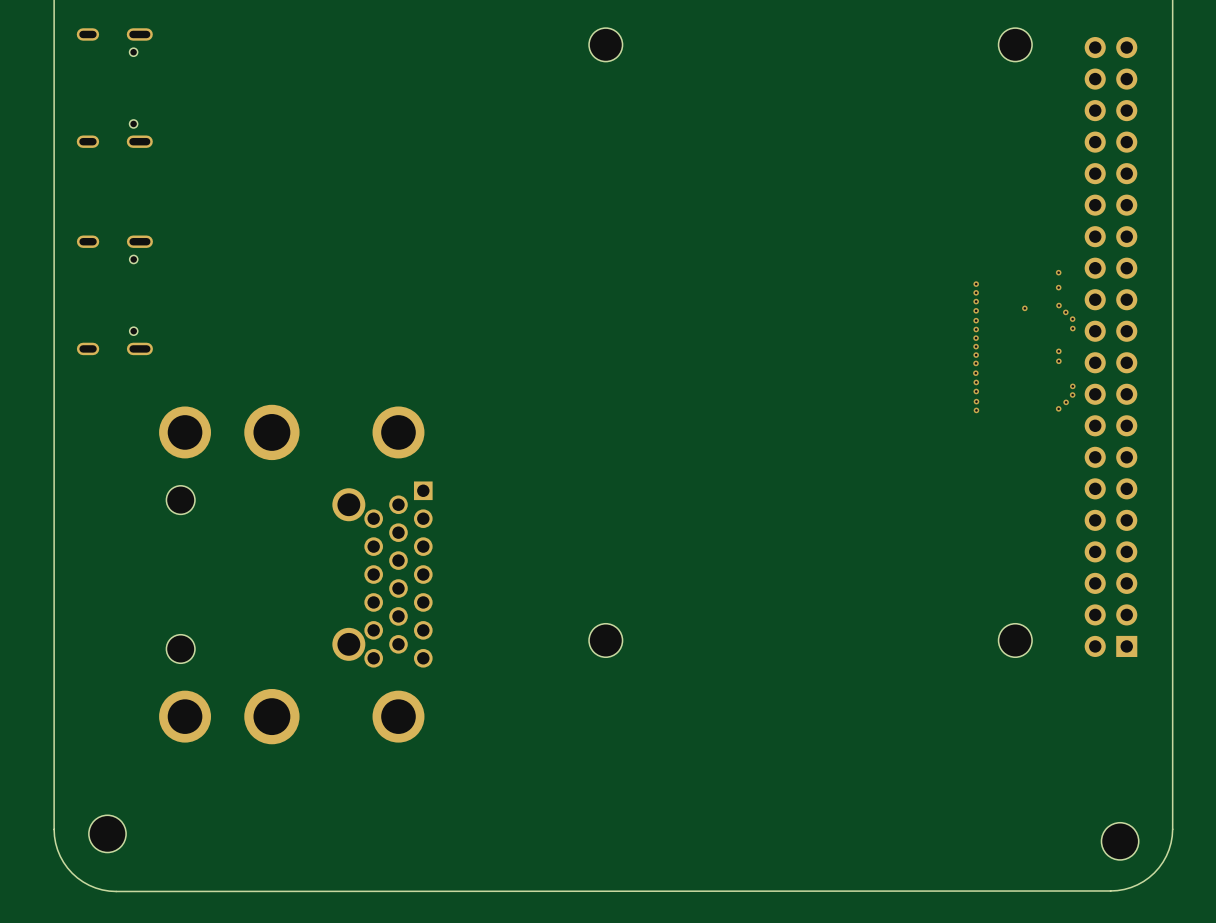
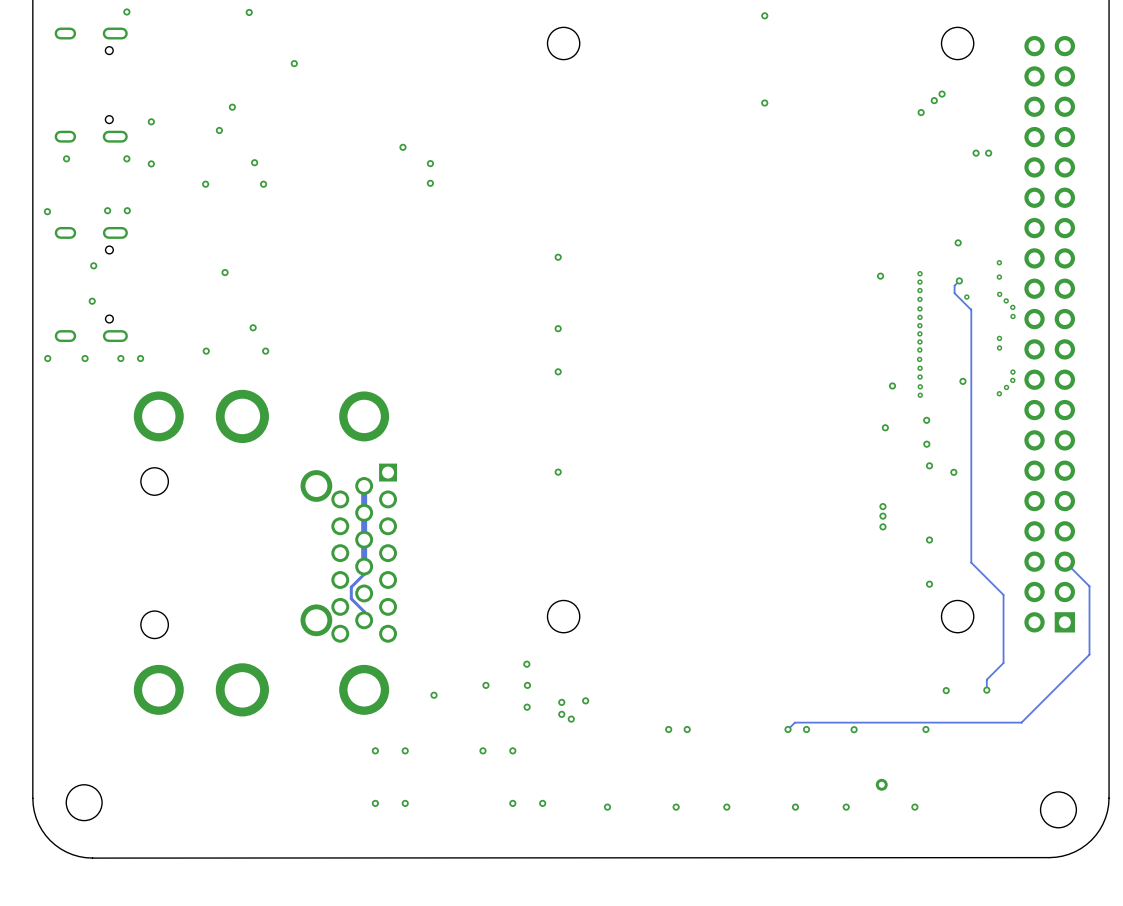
via: none -> (126, 11)
via: none -> (249, 12)
via: none -> (764, 15)
via: none -> (294, 63)
via: none -> (942, 94)
via: none -> (934, 100)
via: none -> (764, 103)
via: none -> (232, 107)
via: none -> (921, 112)
via: none -> (151, 121)
via: none -> (219, 130)
via: none -> (402, 147)
via: none -> (976, 153)
via: none -> (988, 153)
via: none -> (66, 158)
via: none -> (126, 158)
via: none -> (254, 162)
via: none -> (151, 163)
via: none -> (430, 163)
via: none -> (430, 183)
via: none -> (205, 184)
via: none -> (263, 184)
via: none -> (107, 210)
via: none -> (127, 210)
via: none -> (47, 211)
via: none -> (958, 242)
via: none -> (558, 257)
via: none -> (93, 265)
via: none -> (225, 272)
via: none -> (880, 276)
track: none -> (959, 280) (954, 285) (954, 293) (971, 309) (971, 562) (1003, 594) (1003, 662) (986, 679) (986, 690)
via: none -> (959, 280)
via: none -> (92, 301)
via: none -> (253, 327)
via: none -> (558, 328)
via: none -> (206, 351)
via: none -> (265, 351)
via: none -> (47, 358)
via: none -> (85, 358)
via: none -> (120, 358)
via: none -> (140, 358)
via: none -> (558, 371)
via: none -> (962, 381)
via: none -> (892, 385)
via: none -> (926, 420)
via: none -> (885, 427)
via: none -> (926, 444)
via: none -> (929, 465)
via: none -> (558, 472)
via: none -> (953, 472)
track: none -> (364, 485) (364, 574) (351, 587) (351, 598) (364, 611) (364, 620)
via: none -> (882, 506)
via: none -> (882, 516)
via: none -> (882, 526)
via: none -> (929, 540)
track: none -> (1064, 561) (1089, 586) (1089, 654) (1021, 722) (794, 722) (788, 729)
via: none -> (929, 584)
via: none -> (526, 664)
via: none -> (485, 685)
via: none -> (527, 685)
via: none -> (986, 690)
via: none -> (946, 690)
via: none -> (434, 695)
via: none -> (585, 700)
via: none -> (561, 702)
via: none -> (527, 707)
via: none -> (561, 714)
via: none -> (571, 719)
via: none -> (668, 729)
via: none -> (687, 729)
via: none -> (788, 729)
via: none -> (806, 729)
via: none -> (925, 729)
via: none -> (854, 729)
via: none -> (375, 750)
via: none -> (405, 750)
via: none -> (482, 750)
via: none -> (512, 750)
via: none -> (881, 784)
via: none -> (375, 803)
via: none -> (405, 803)
via: none -> (512, 803)
via: none -> (542, 803)
via: none -> (607, 807)
via: none -> (676, 807)
via: none -> (726, 807)
via: none -> (795, 807)
via: none -> (846, 807)
via: none -> (914, 807)

